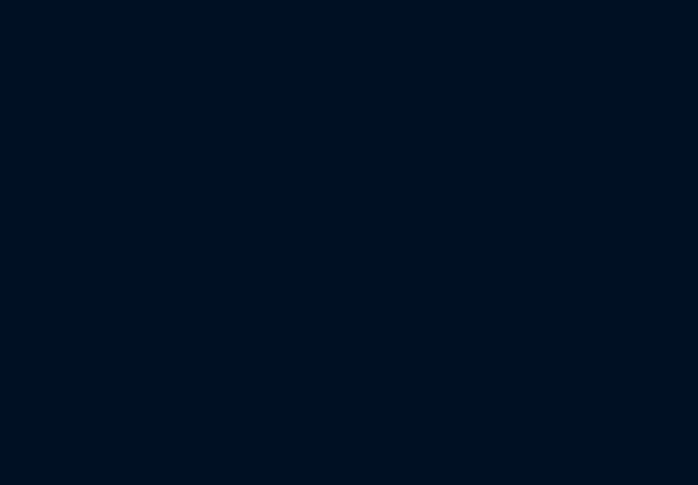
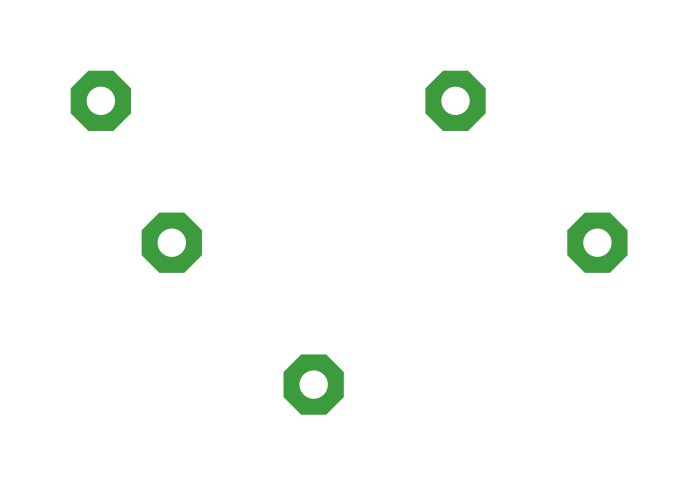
part: none -> (100, 100)
part: none -> (455, 100)
part: none -> (171, 242)
part: none -> (597, 242)
part: none -> (313, 384)

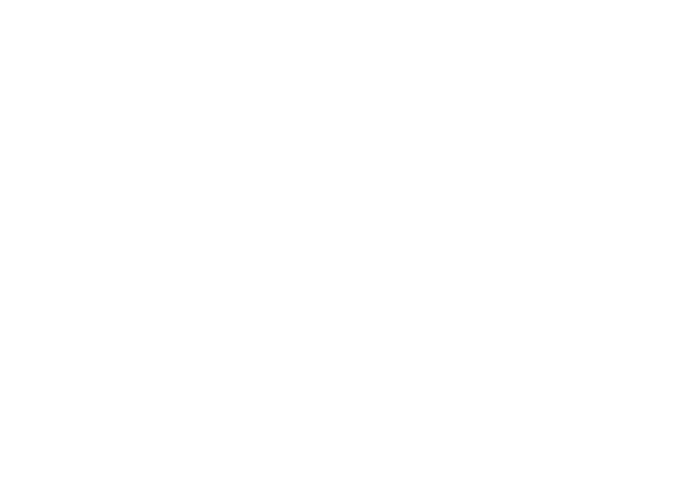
part: (100, 100) -> none
part: (455, 100) -> none
part: (171, 242) -> none
part: (597, 242) -> none
part: (313, 384) -> none

